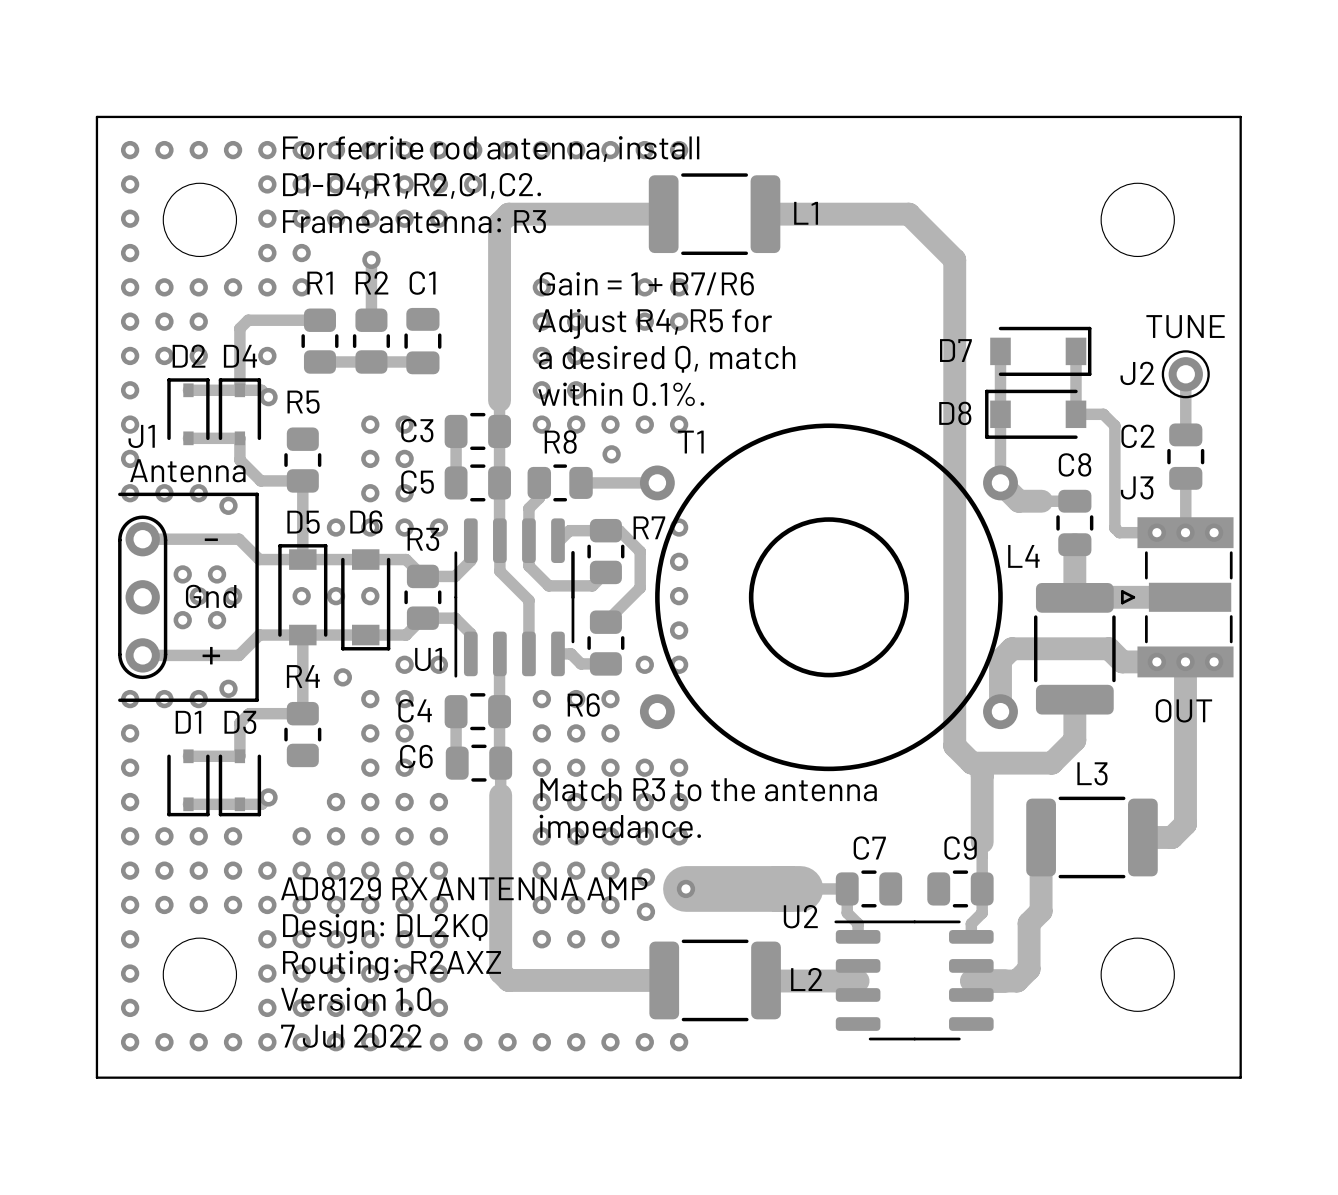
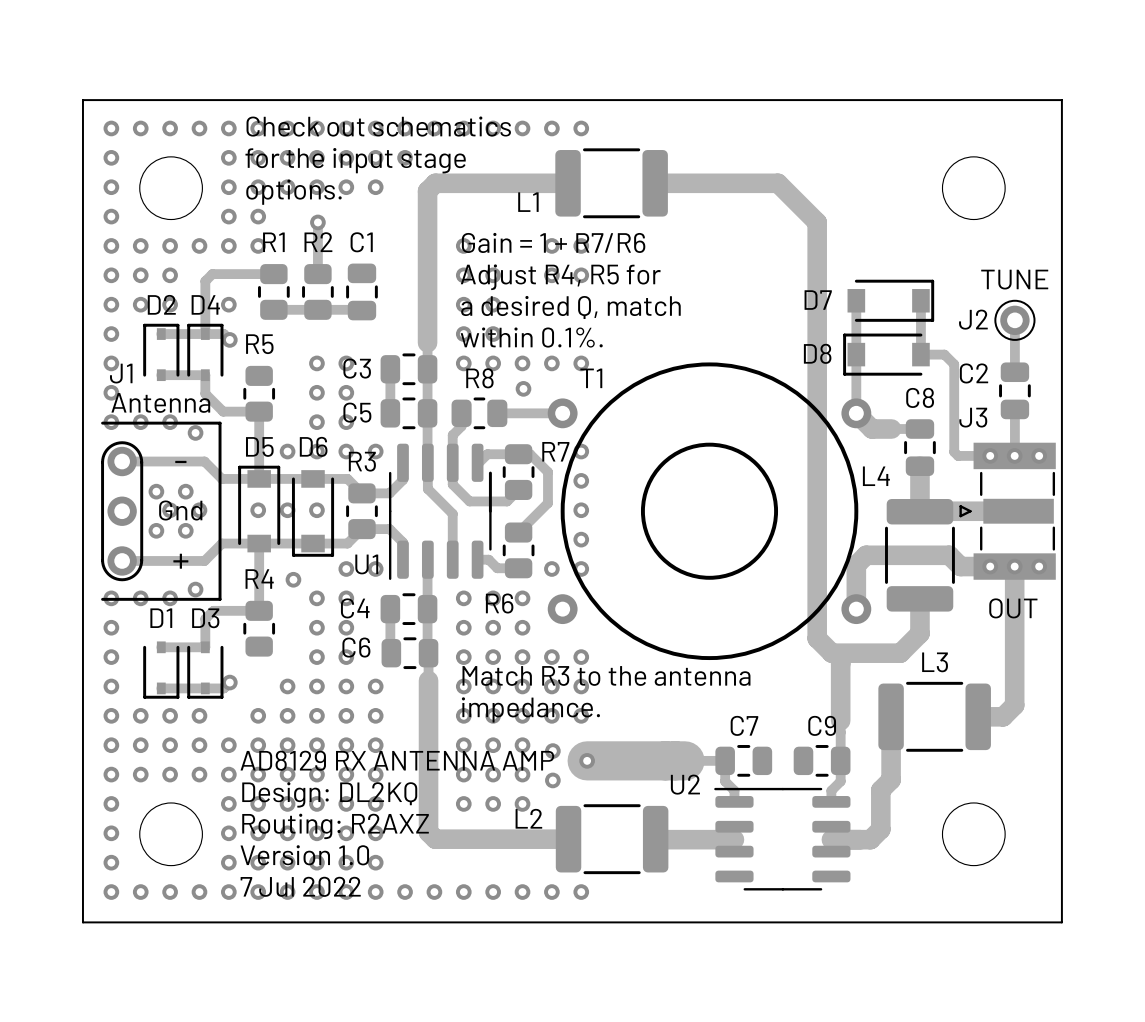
text: For ferrite rod antenna, install (491, 149) -> Check out schematics (378, 126)
text: D1-D4,R1,R2,C1,C2. (412, 185) -> for the input stage (355, 160)
L1 name position: L1 (806, 213) -> L1 (528, 202)
text: Frame antenna: R3 (414, 221) -> options. (293, 192)
L2 name position: L2 (806, 979) -> L2 (528, 818)

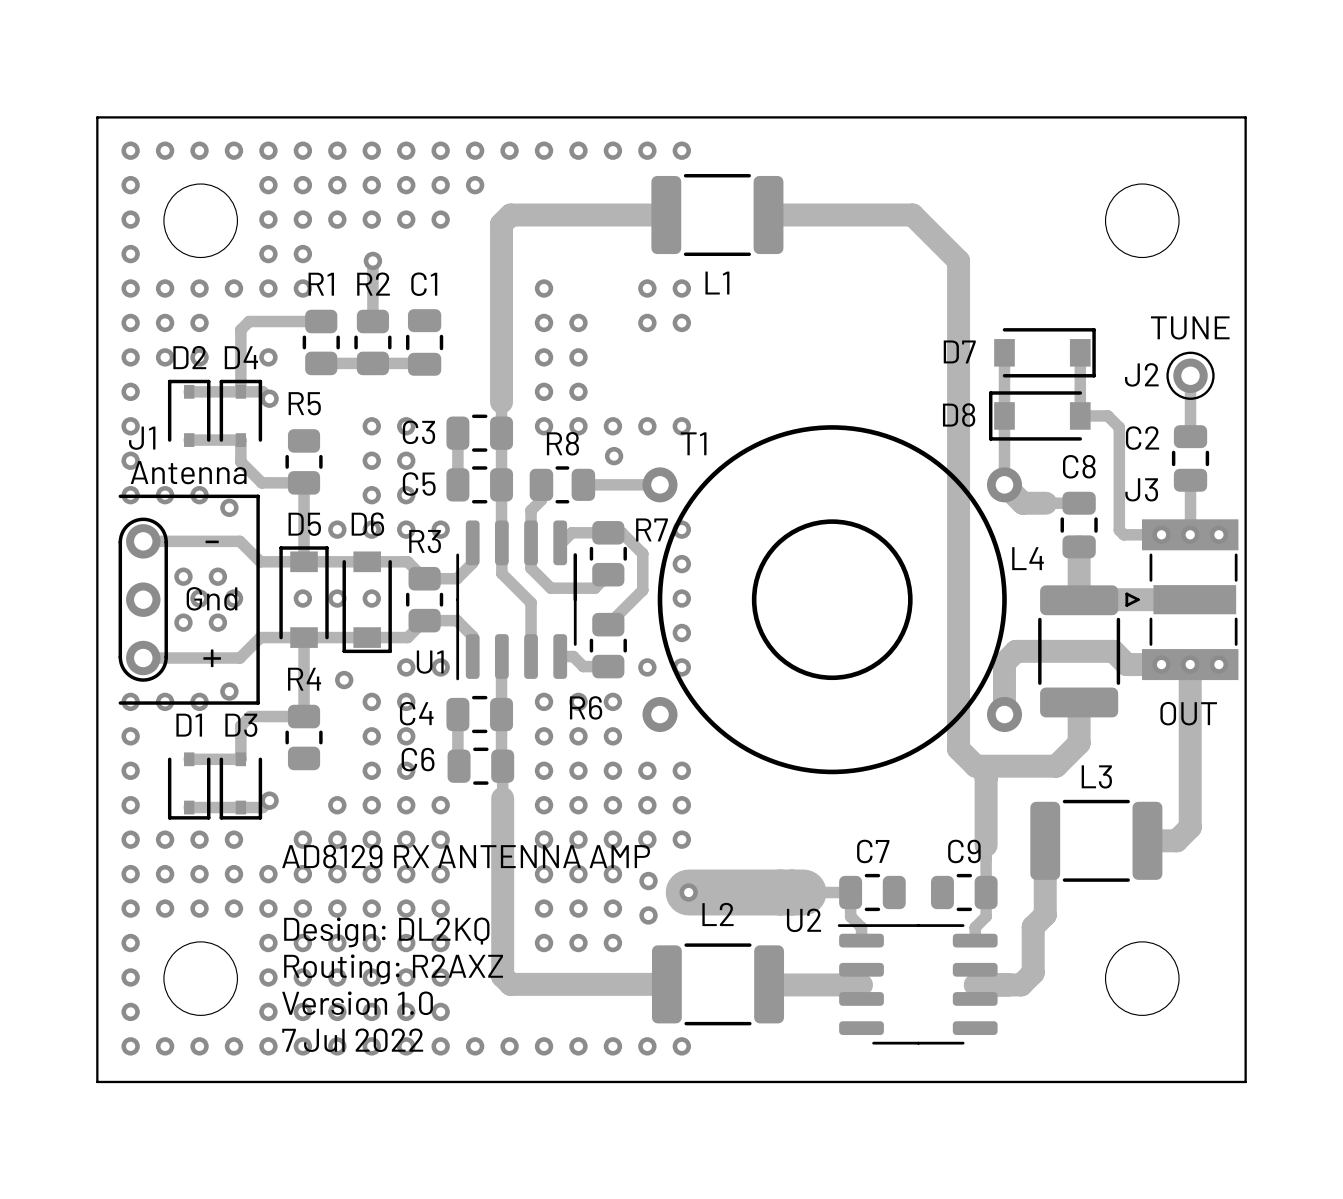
text: Check out schematics (378, 126) -> none
text: for the input stage (355, 160) -> none
text: options. (293, 192) -> none
L1 name position: L1 (528, 202) -> L1 (717, 283)
text: Gain = 1 + R7/R6 (553, 242) -> none
text: Adjust R4, R5 for (560, 277) -> none
text: a desired Q, match (570, 307) -> none
text: within 0.1%. (531, 337) -> none
text: Match R3 to the antenna (606, 675) -> none
text: impedance. (530, 709) -> none
text position: AD8129 RX ANTENNA AMP (397, 760) -> AD8129 RX ANTENNA AMP (466, 856)
L2 name position: L2 (528, 818) -> L2 (718, 914)

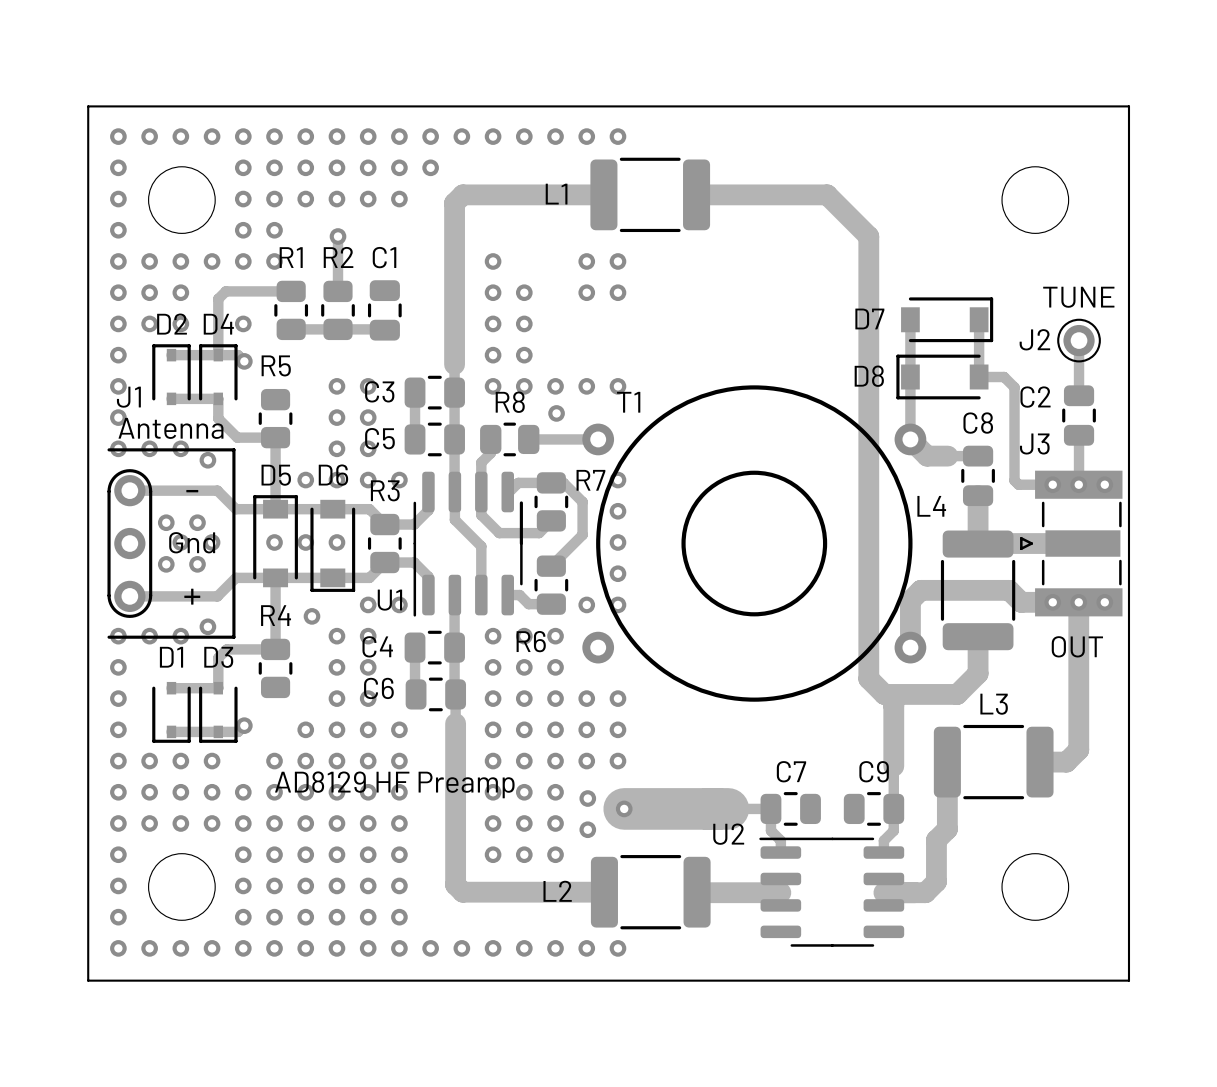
L1 name position: L1 (717, 283) -> L1 (556, 194)
text: AD8129 RX ANTENNA AMP (466, 856) -> none
text: none -> AD8129 HF Preamp (394, 784)
L2 name position: L2 (718, 914) -> L2 (557, 891)
text: Design: DL2KQ (386, 932) -> none
text: Routing: R2AXZ (393, 969) -> none
text: Version 1.0 (357, 1003) -> none
text: 7 Jul 2022 (352, 1040) -> none

